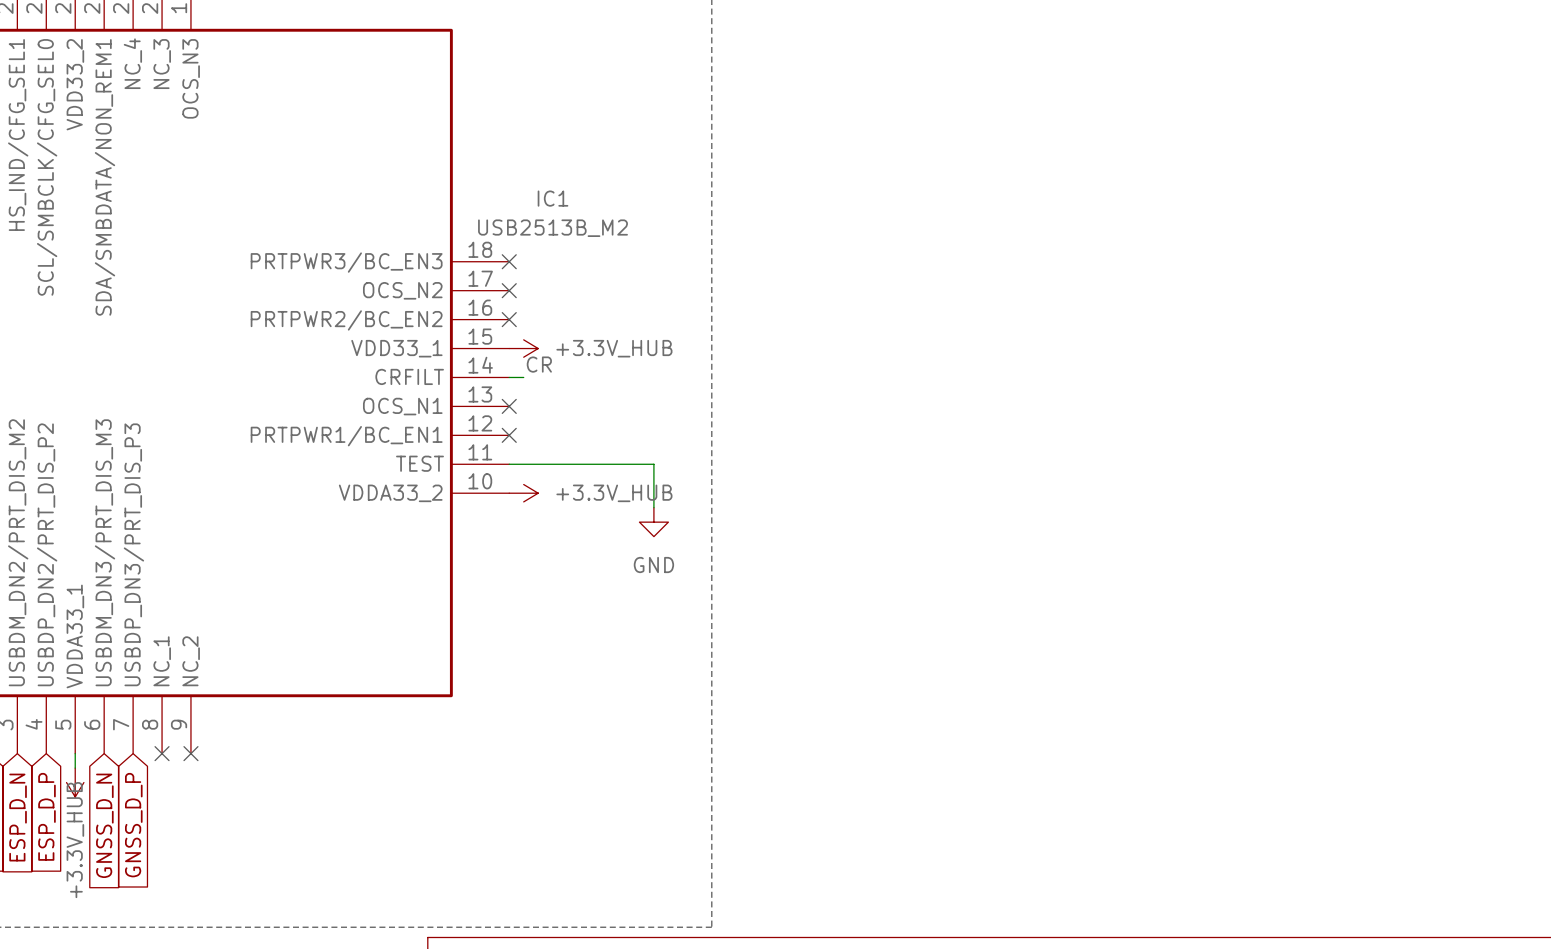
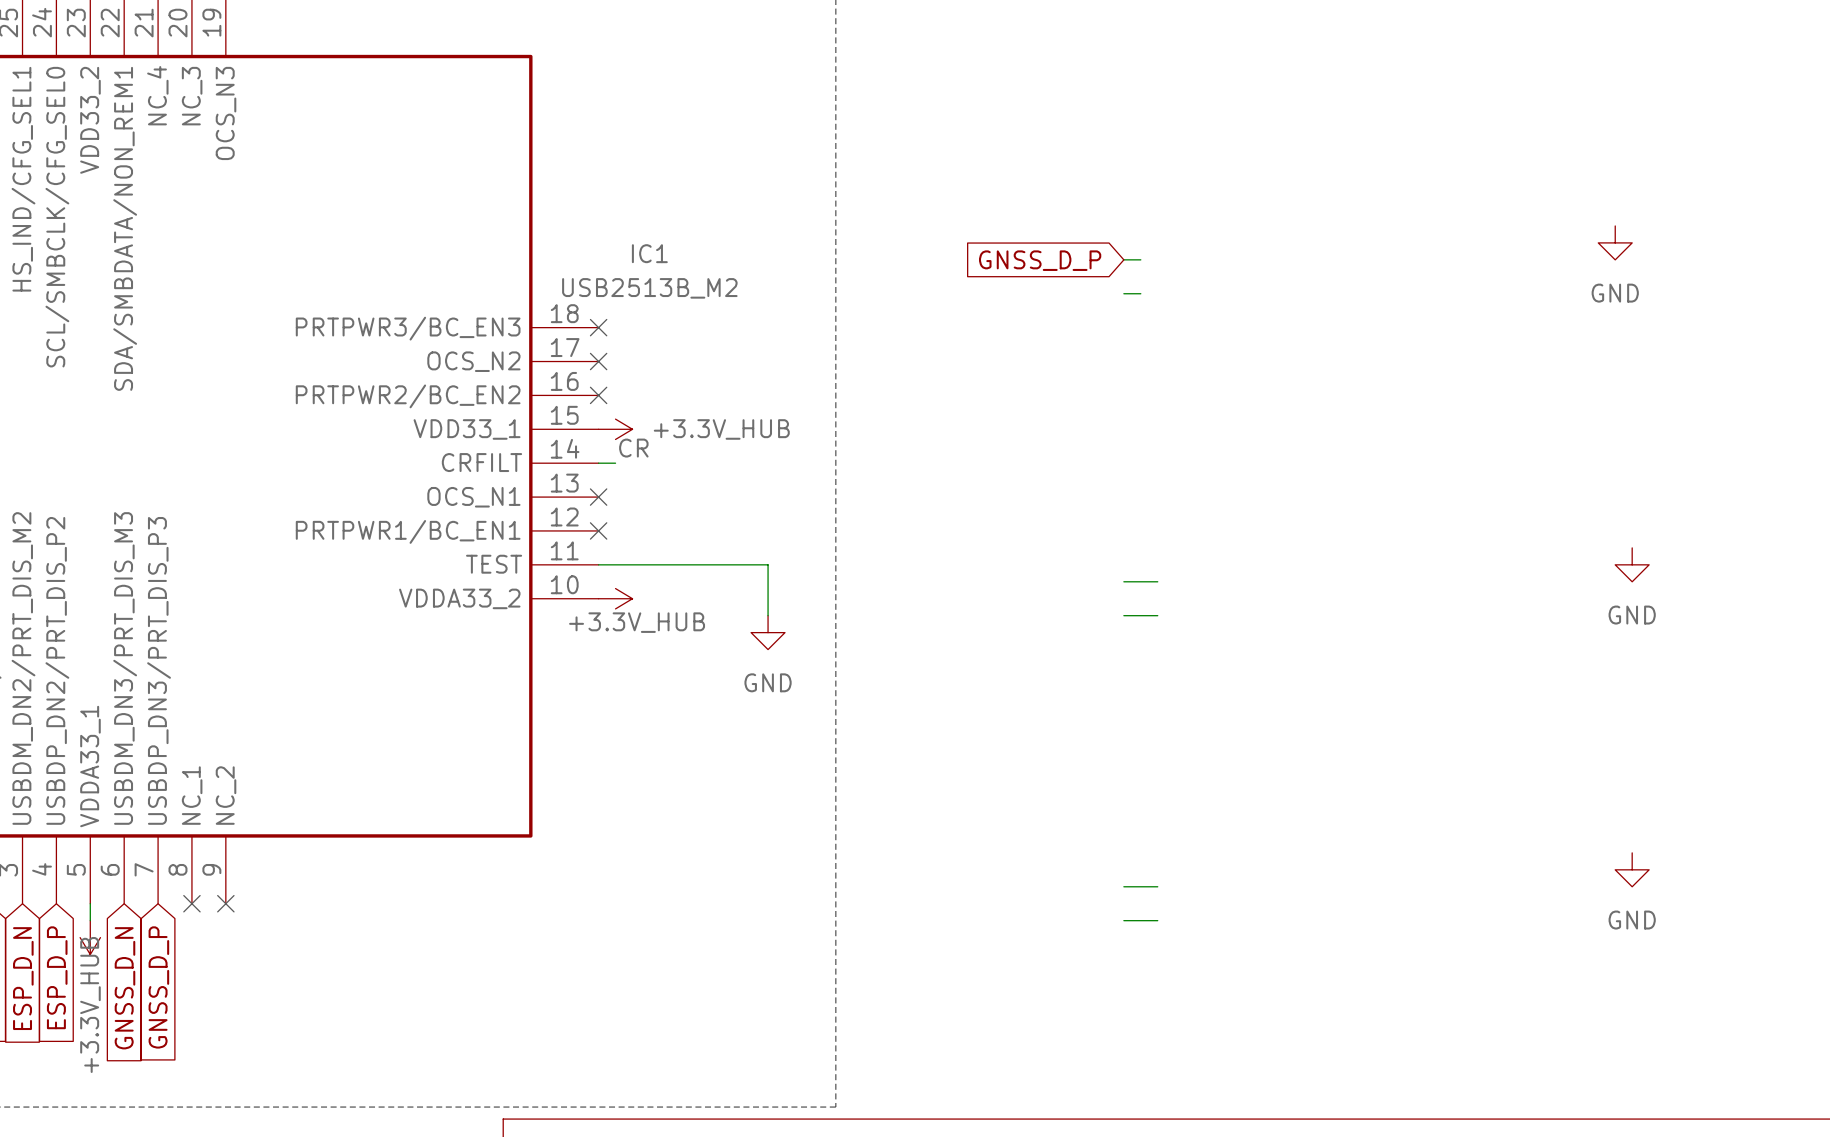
power symbol: none -> GND (1615, 242)
wire: none -> (1123, 259) (1140, 259)
global label: none -> GNSS_D_P (1040, 260)
wire: none -> (1123, 293) (1140, 293)
power symbol: none -> GND (1632, 564)
wire: none -> (1123, 581) (1157, 581)
power symbol text position: +3.3V_HUB (614, 493) -> +3.3V_HUB (637, 622)
wire: none -> (1123, 615) (1157, 615)
power symbol: none -> GND (1632, 869)
wire: none -> (1123, 886) (1157, 886)
wire: none -> (1123, 920) (1157, 920)

